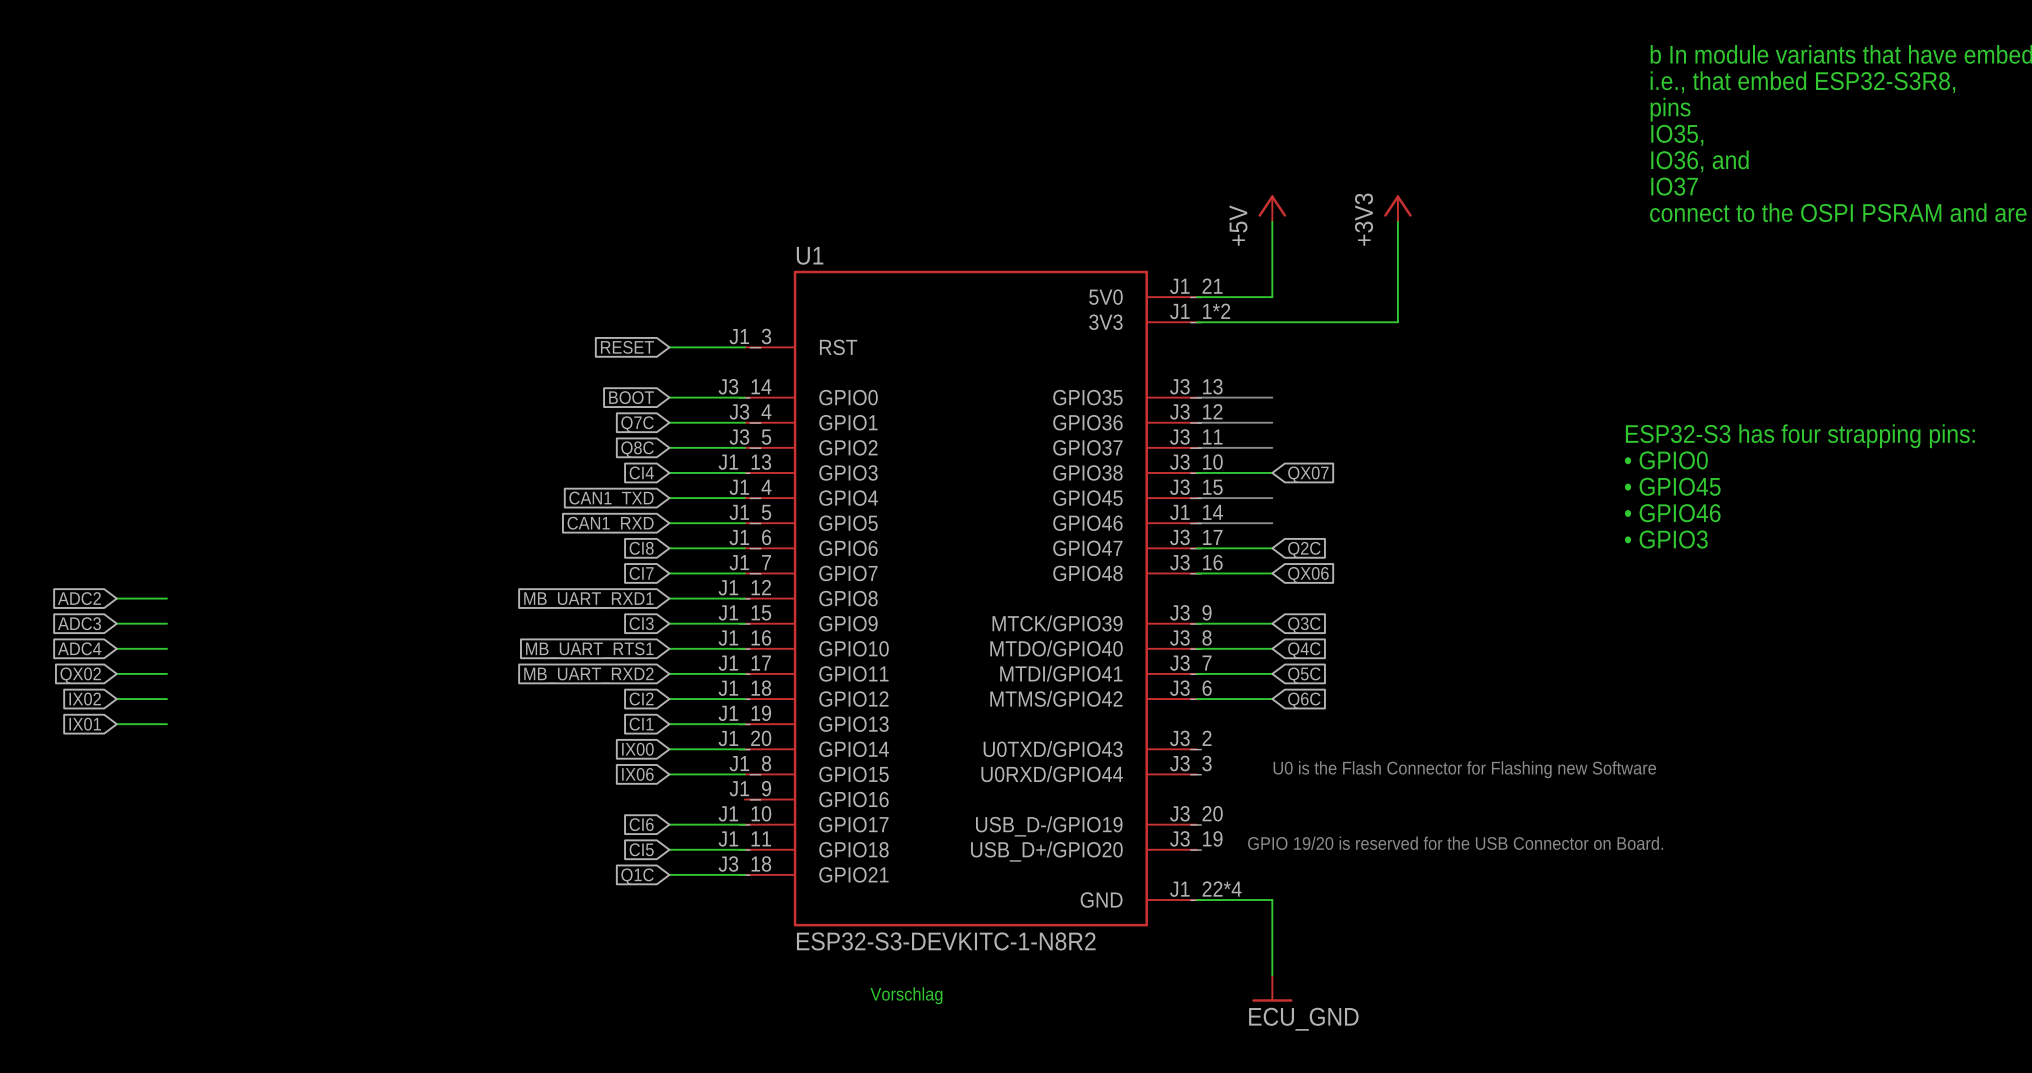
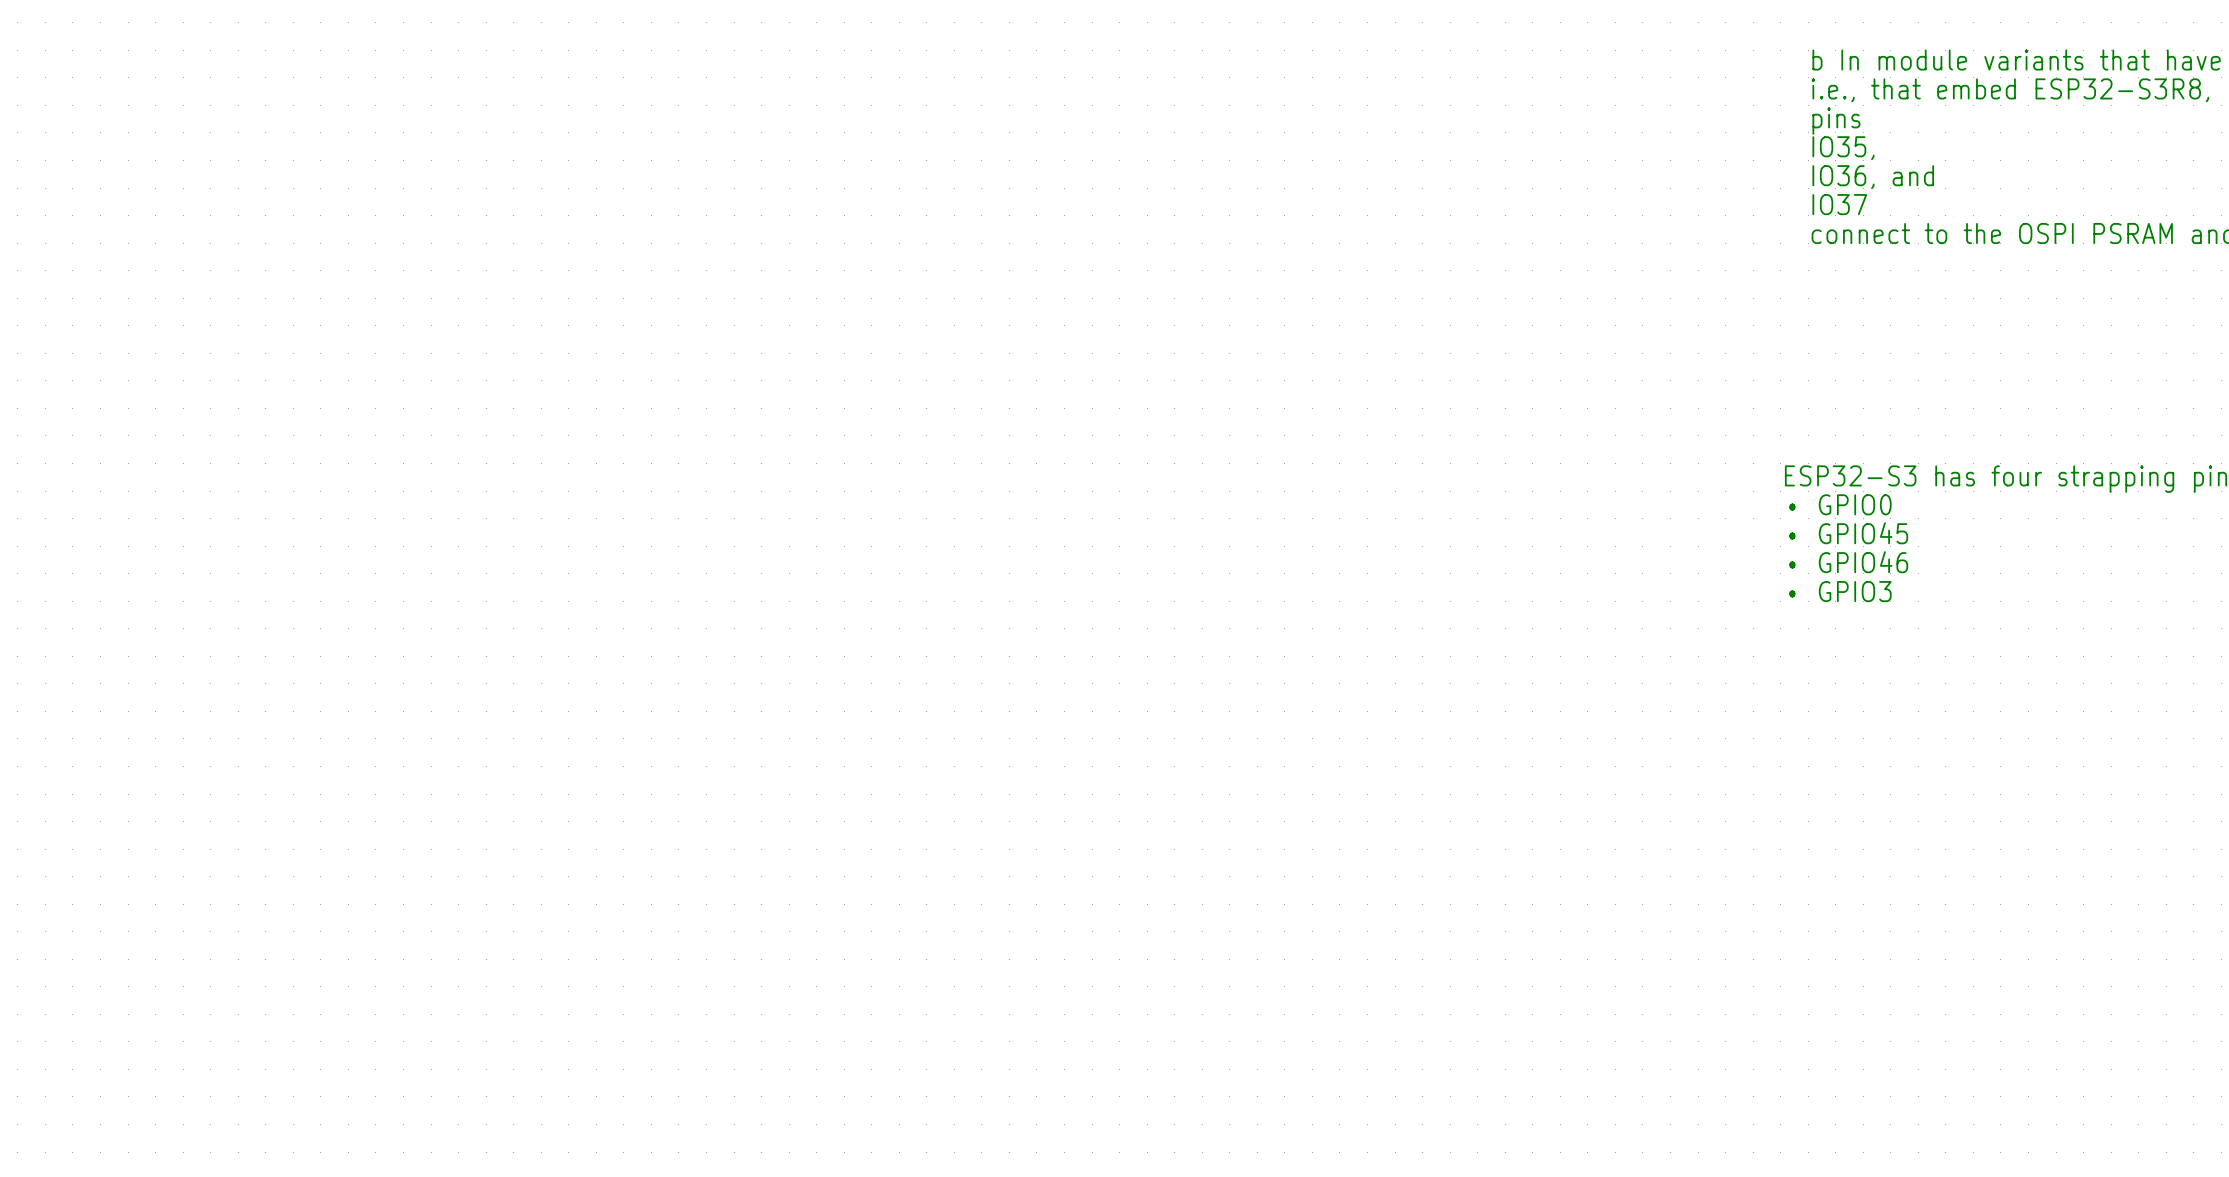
power symbol: +5V (1272, 208) -> none
power symbol: +3V3 (1397, 208) -> none
wire: (1272, 221) (1272, 297) (1196, 297) -> none
wire: (1397, 221) (1397, 322) (1196, 322) -> none
global label: RESET (627, 347) -> none
wire: (669, 347) (744, 347) -> none
global label: BOOT (631, 397) -> none
wire: (669, 397) (744, 397) -> none
line: (1196, 397) (1272, 397) -> none
wire: (669, 422) (744, 422) -> none
line: (1196, 422) (1272, 422) -> none
global label: Q7C (637, 424) -> none
wire: (669, 447) (744, 447) -> none
line: (1196, 447) (1272, 447) -> none
global label: Q8C (637, 449) -> none
global label: CI4 (641, 472) -> none
wire: (669, 472) (744, 472) -> none
wire: (1196, 472) (1272, 472) -> none
global label: QX07 (1308, 474) -> none
wire: (669, 498) (744, 498) -> none
line: (1196, 498) (1272, 498) -> none
global label: CAN1_TXD (611, 499) -> none
wire: (669, 523) (744, 523) -> none
line: (1196, 523) (1272, 523) -> none
global label: CAN1_RXD (610, 524) -> none
global label: CI8 (641, 548) -> none
wire: (669, 548) (744, 548) -> none
wire: (1196, 548) (1272, 548) -> none
global label: Q2C (1304, 549) -> none
global label: CI7 (641, 573) -> none
wire: (669, 573) (744, 573) -> none
wire: (1196, 573) (1272, 573) -> none
global label: QX06 (1308, 575) -> none
global label: ADC2 (79, 598) -> none
wire: (116, 598) (167, 598) -> none
wire: (669, 598) (744, 598) -> none
U1: ESP32-S3-DEVKITC-1-N8R2 (970, 598) -> none
global label: MB_UART_RXD1 (588, 600) -> none
global label: ADC3 (79, 623) -> none
wire: (116, 623) (167, 623) -> none
global label: CI3 (641, 623) -> none
wire: (669, 623) (744, 623) -> none
wire: (1196, 623) (1272, 623) -> none
global label: Q3C (1304, 625) -> none
global label: ADC4 (79, 648) -> none
wire: (116, 648) (167, 648) -> none
wire: (669, 648) (744, 648) -> none
wire: (1196, 648) (1272, 648) -> none
global label: MB_UART_RTS1 (589, 650) -> none
global label: Q4C (1304, 650) -> none
wire: (116, 673) (167, 673) -> none
wire: (669, 673) (744, 673) -> none
wire: (1196, 673) (1272, 673) -> none
global label: QX02 (80, 675) -> none
global label: MB_UART_RXD2 (588, 675) -> none
global label: Q5C (1304, 675) -> none
global label: IX02 (85, 699) -> none
wire: (116, 699) (167, 699) -> none
global label: CI2 (641, 699) -> none
wire: (669, 699) (744, 699) -> none
wire: (1196, 699) (1272, 699) -> none
global label: Q6C (1304, 700) -> none
global label: IX01 (85, 724) -> none
wire: (116, 724) (167, 724) -> none
global label: CI1 (641, 724) -> none
wire: (669, 724) (744, 724) -> none
global label: IX00 (637, 749) -> none
wire: (669, 749) (744, 749) -> none
text: U0 is the Flash Connector for Flashing new Software (1464, 769) -> none
global label: IX06 (637, 774) -> none
wire: (669, 774) (744, 774) -> none
global label: CI6 (641, 824) -> none
wire: (669, 824) (744, 824) -> none
text: GPIO 19/20 is reserved for the USB Connector on Board. (1455, 843) -> none
global label: CI5 (641, 849) -> none
wire: (669, 849) (744, 849) -> none
wire: (669, 874) (744, 874) -> none
global label: Q1C (637, 876) -> none
wire: (1196, 900) (1272, 900) (1272, 975) -> none
power symbol: ECU_GND (1272, 988) -> none
text: Vorschlag (906, 995) -> none

